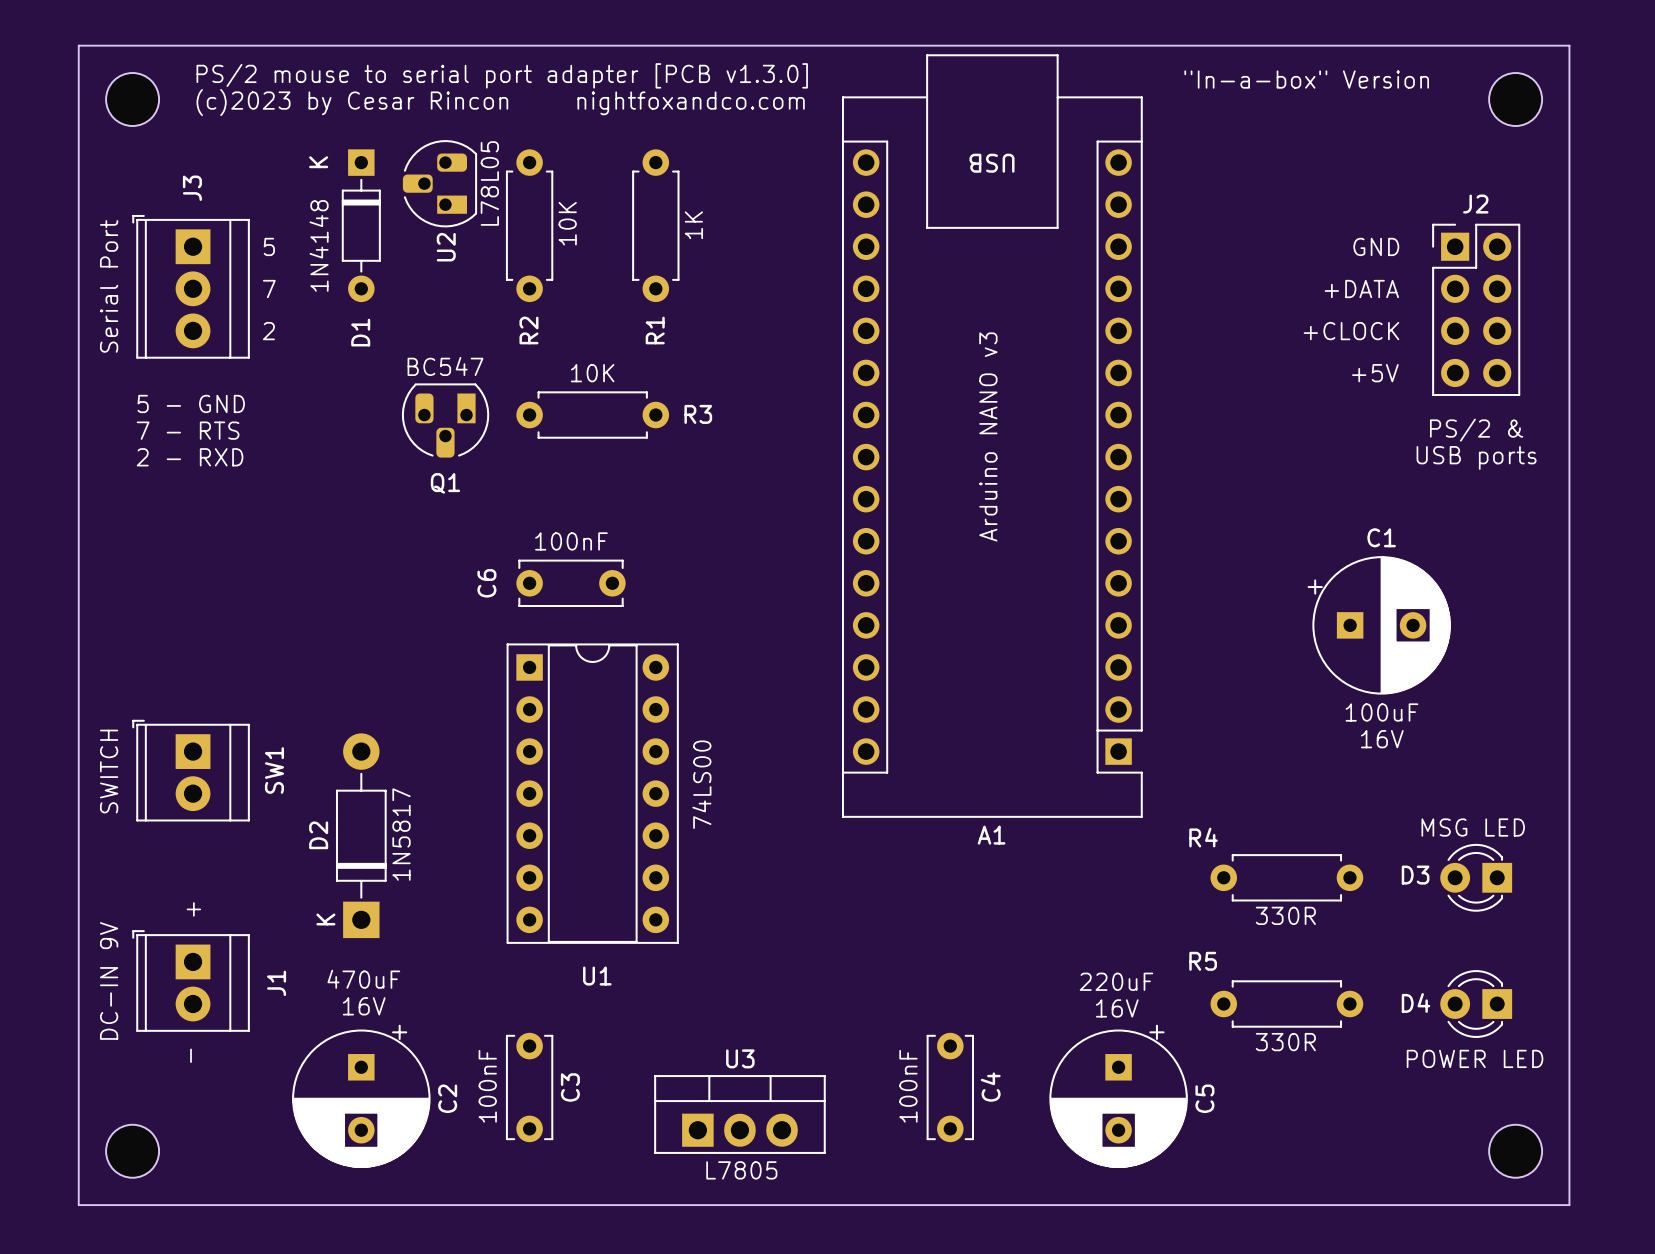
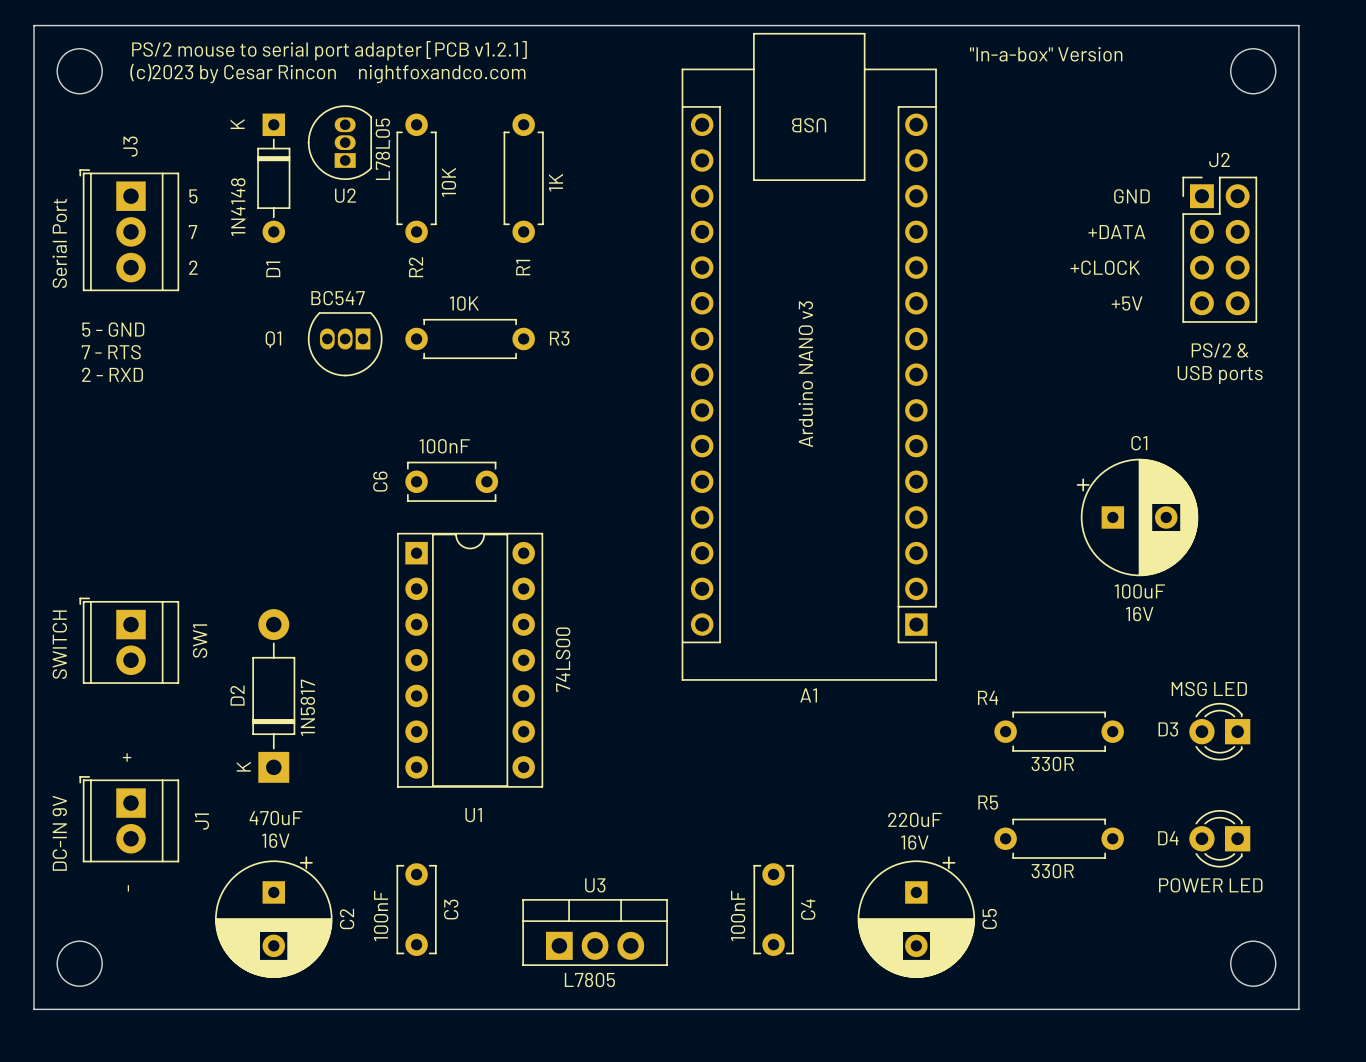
text: PS/2 mouse to serial port adapter [PCB v1.3.0] (502, 75) -> PS/2 mouse to serial port adapter [PCB v1.2.1] (329, 50)
U2 footprint: [402, 140, 478, 228] -> [307, 105, 373, 181]
Q1 footprint: [401, 383, 490, 458] -> [307, 312, 383, 377]
Q1 name position: Q1 (445, 483) -> Q1 (273, 339)

